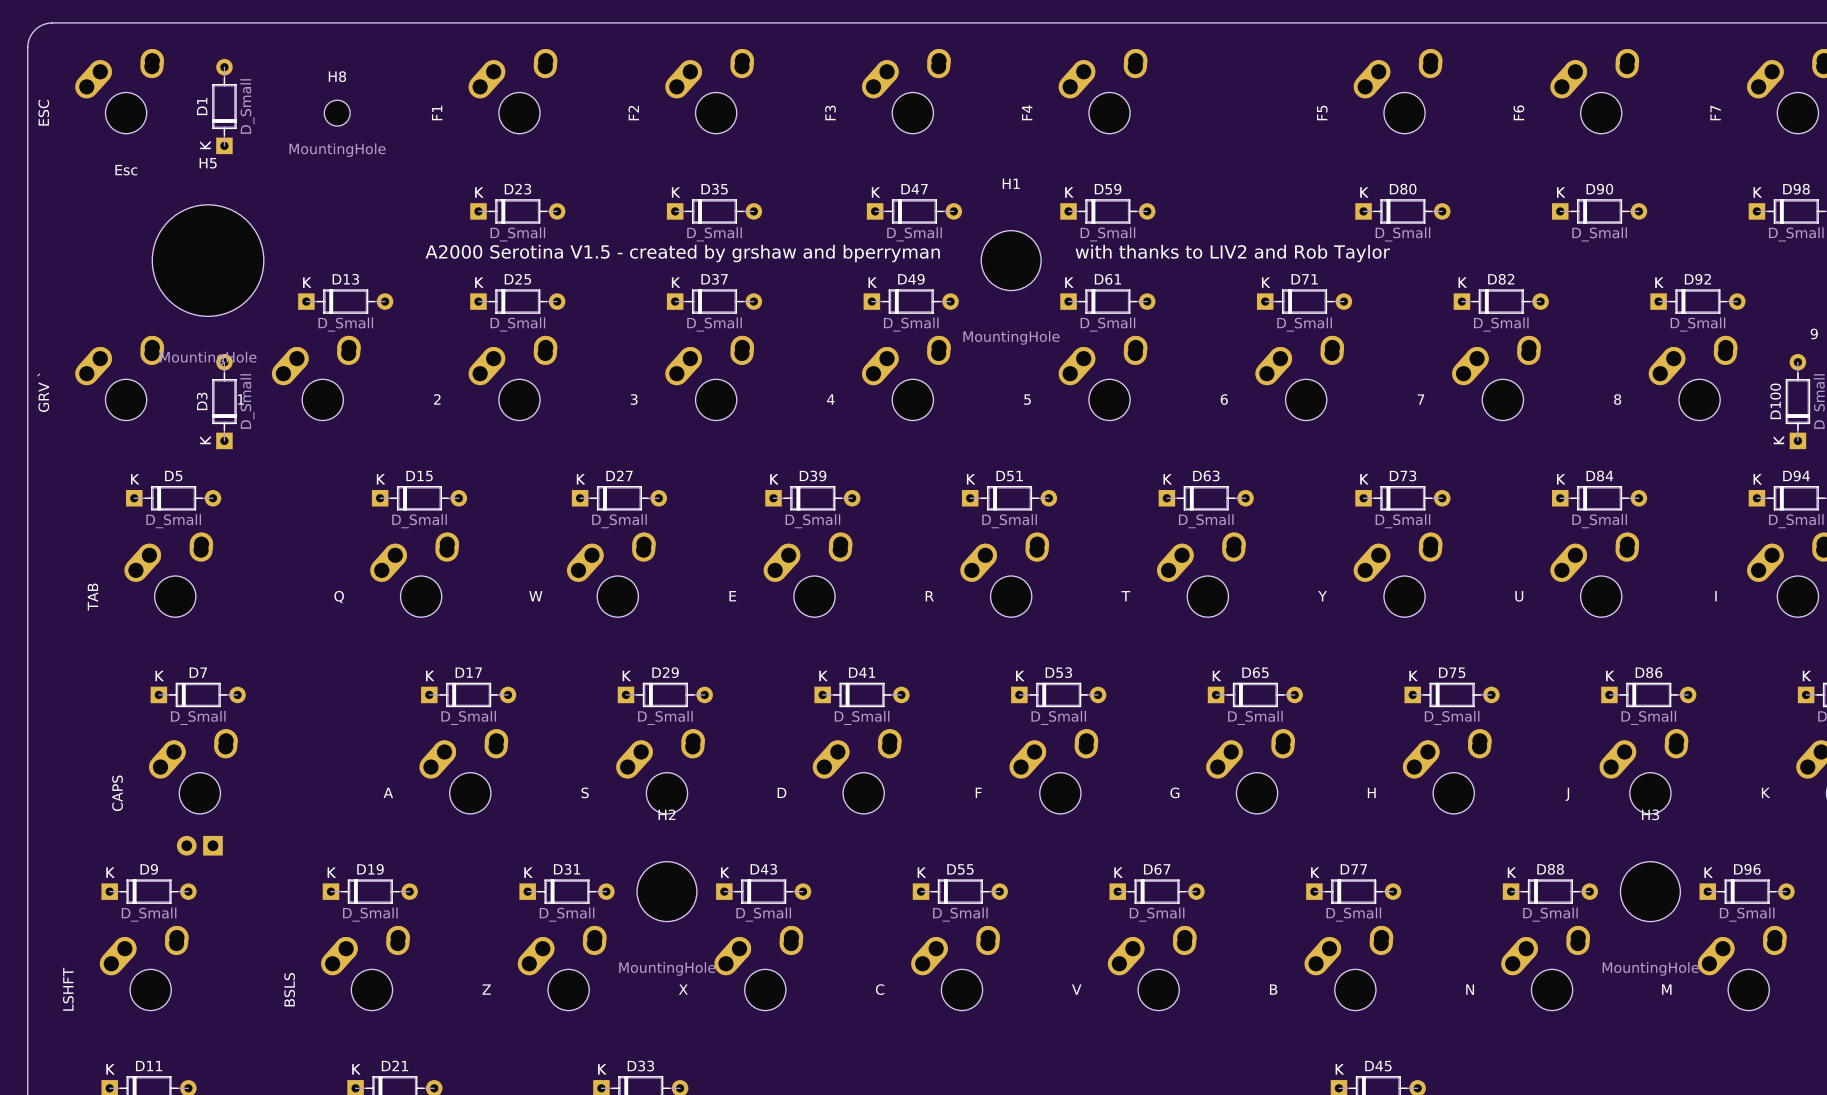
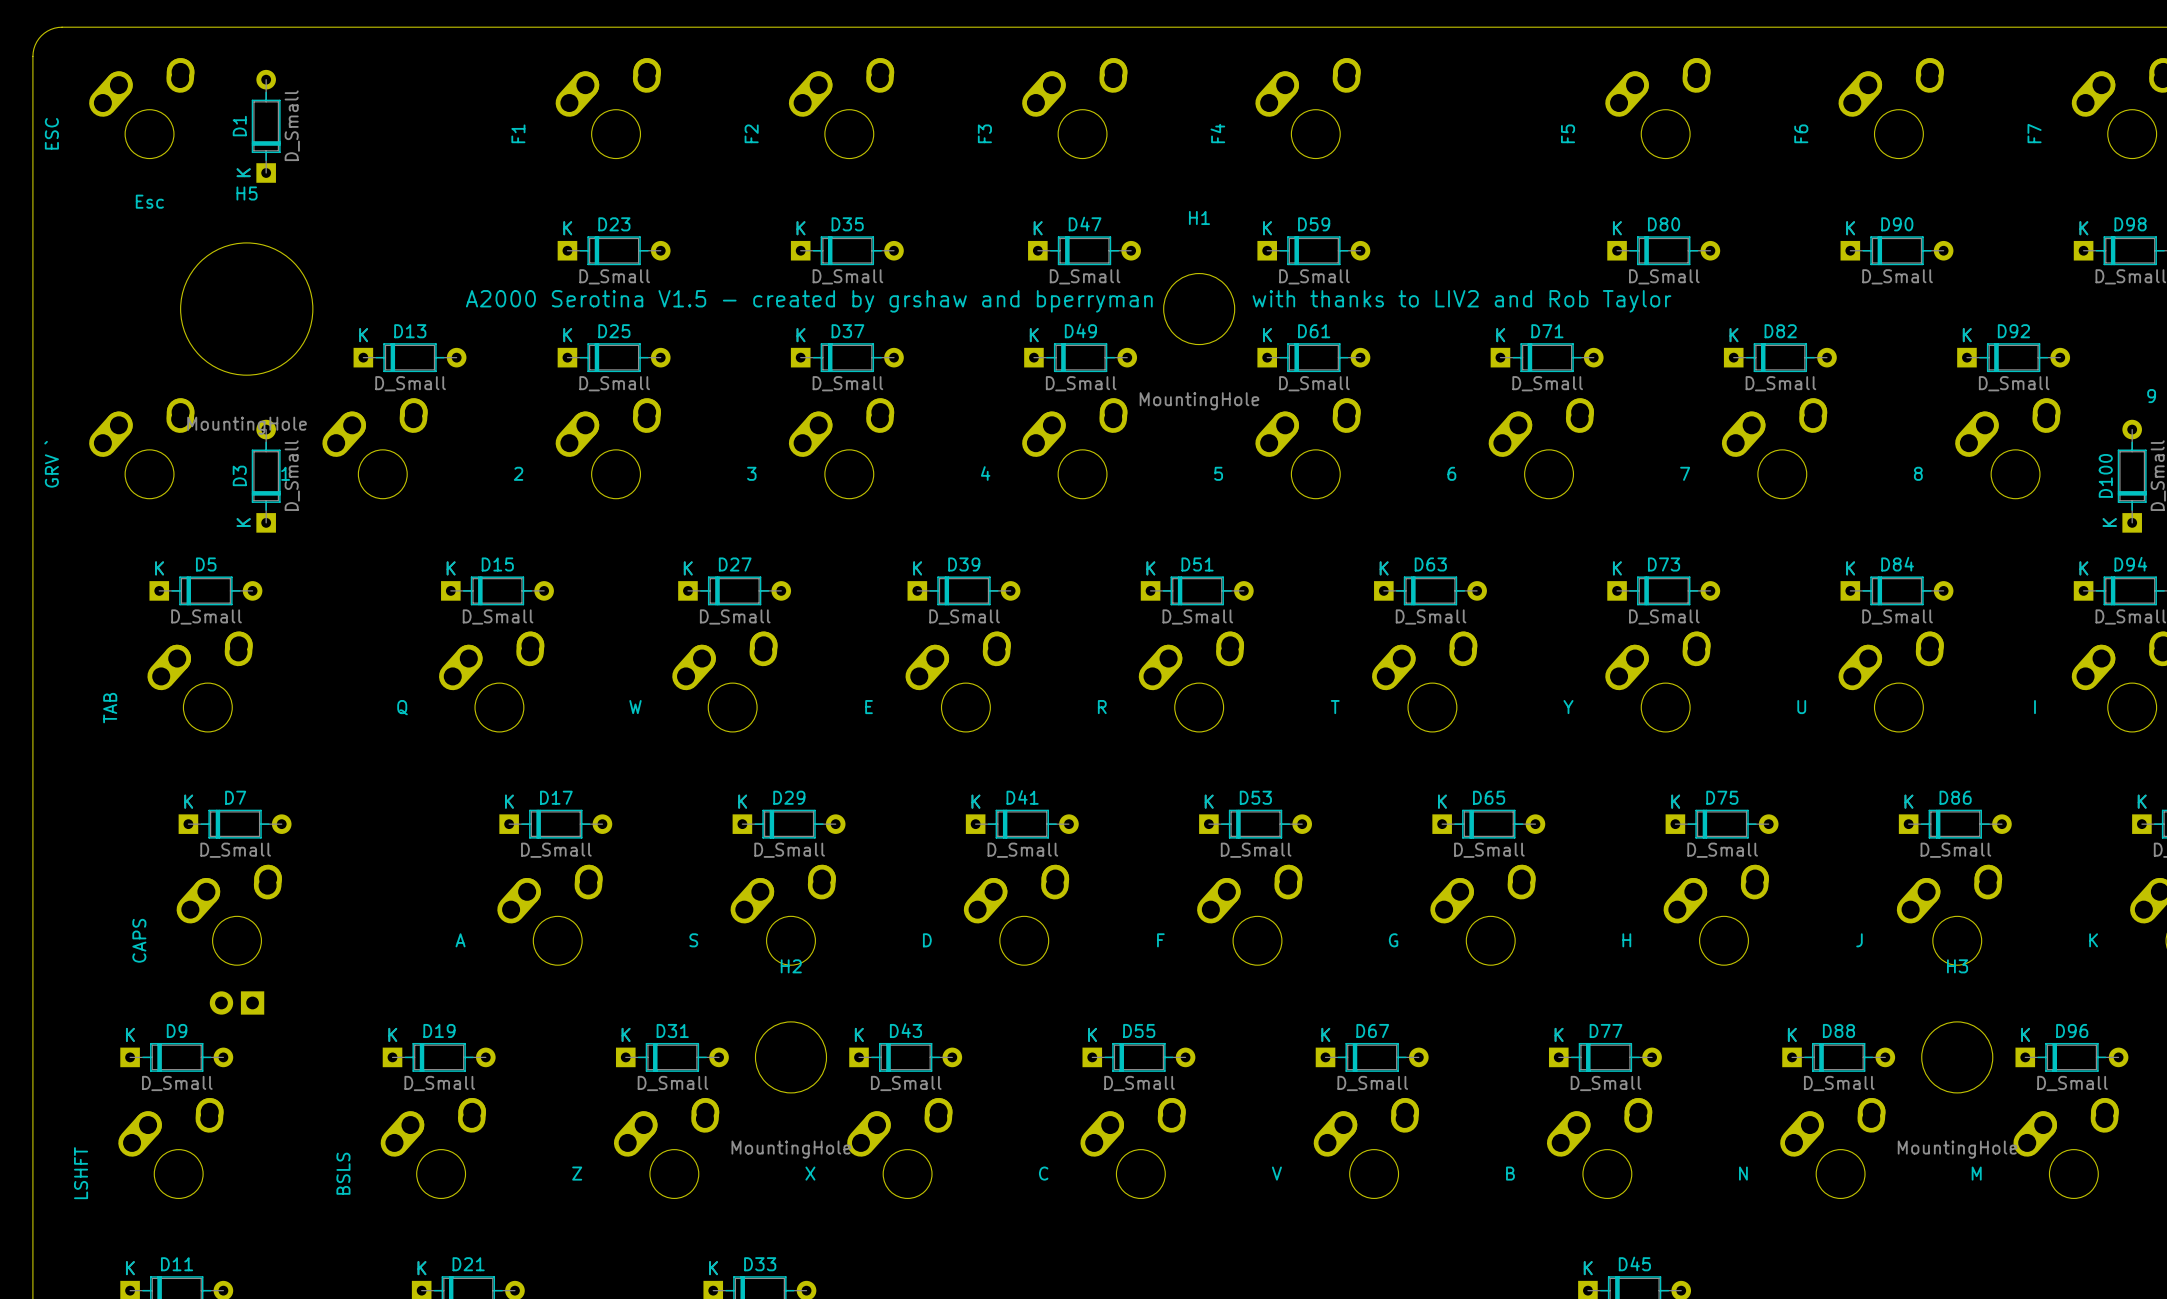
H8: MountingHole (337, 113) -> none

